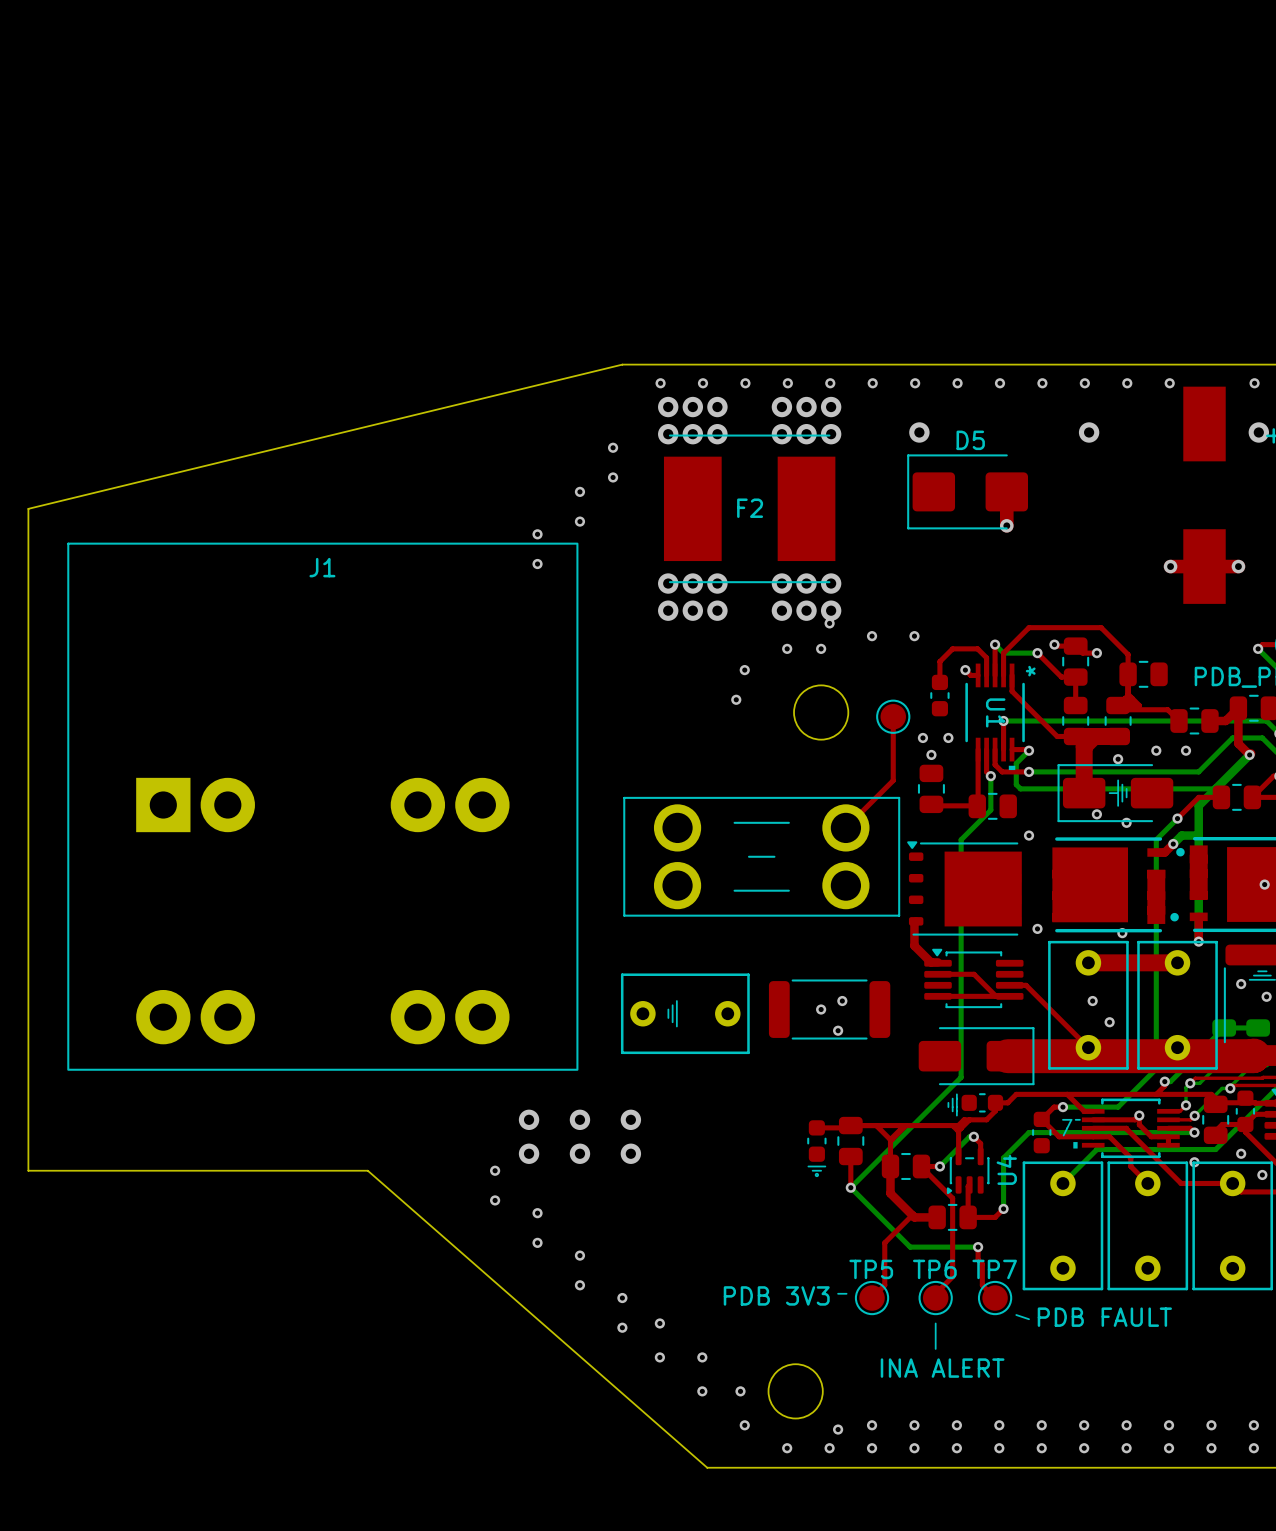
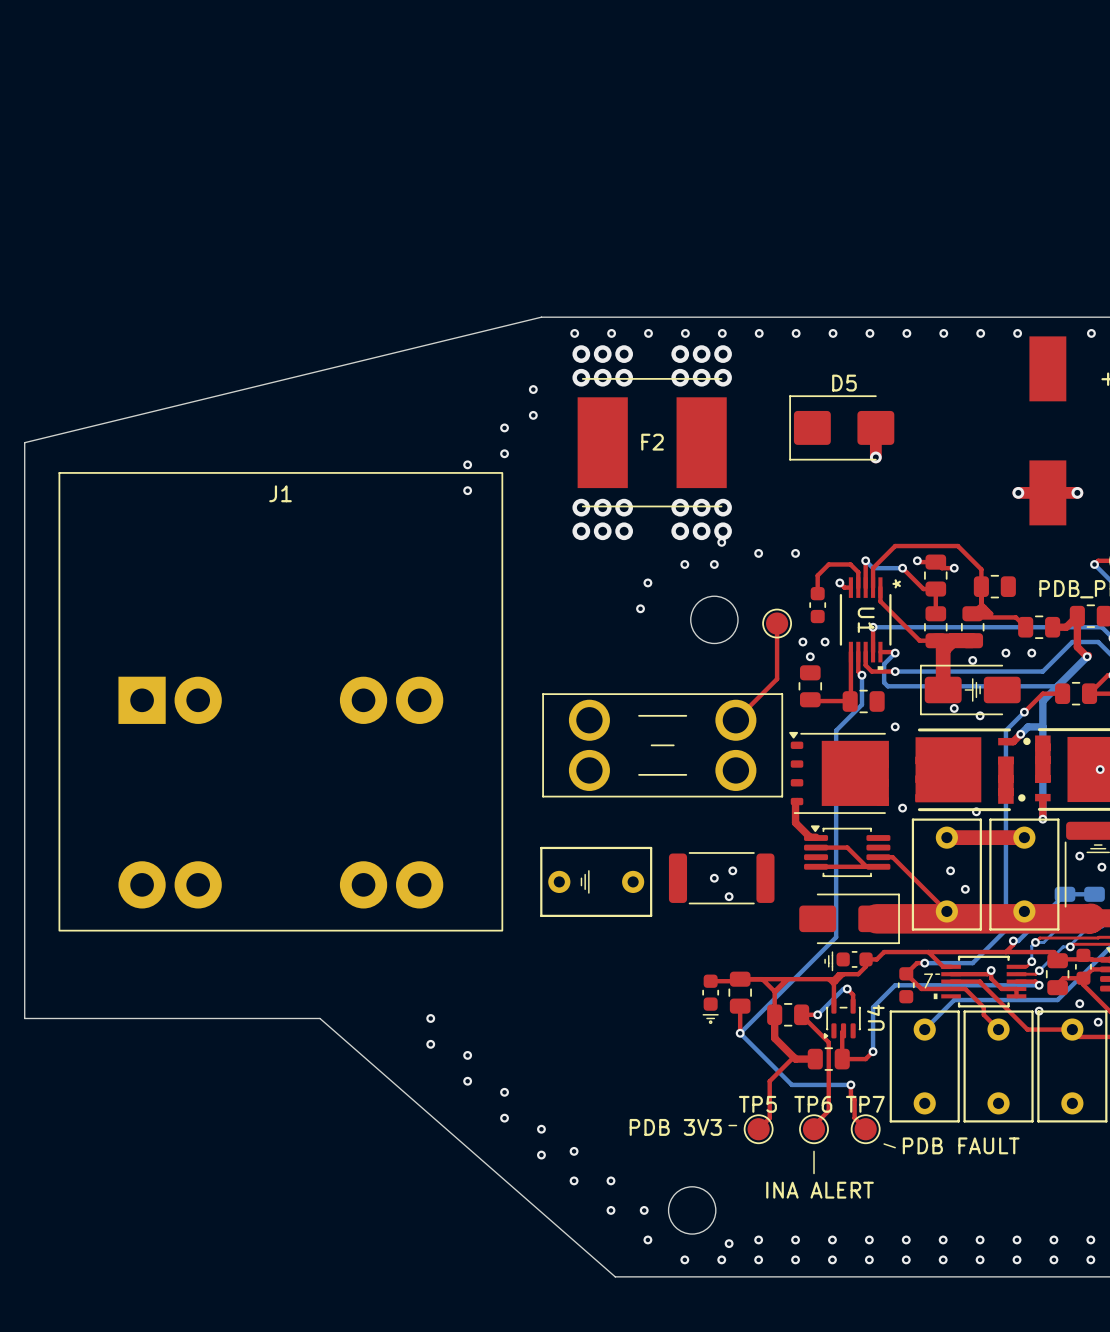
via: (919, 432) -> none
via: (1089, 432) -> none
via: (1258, 432) -> none
via: (529, 1119) -> none
via: (579, 1119) -> none
via: (630, 1119) -> none
via: (529, 1153) -> none
via: (579, 1153) -> none
via: (630, 1153) -> none

